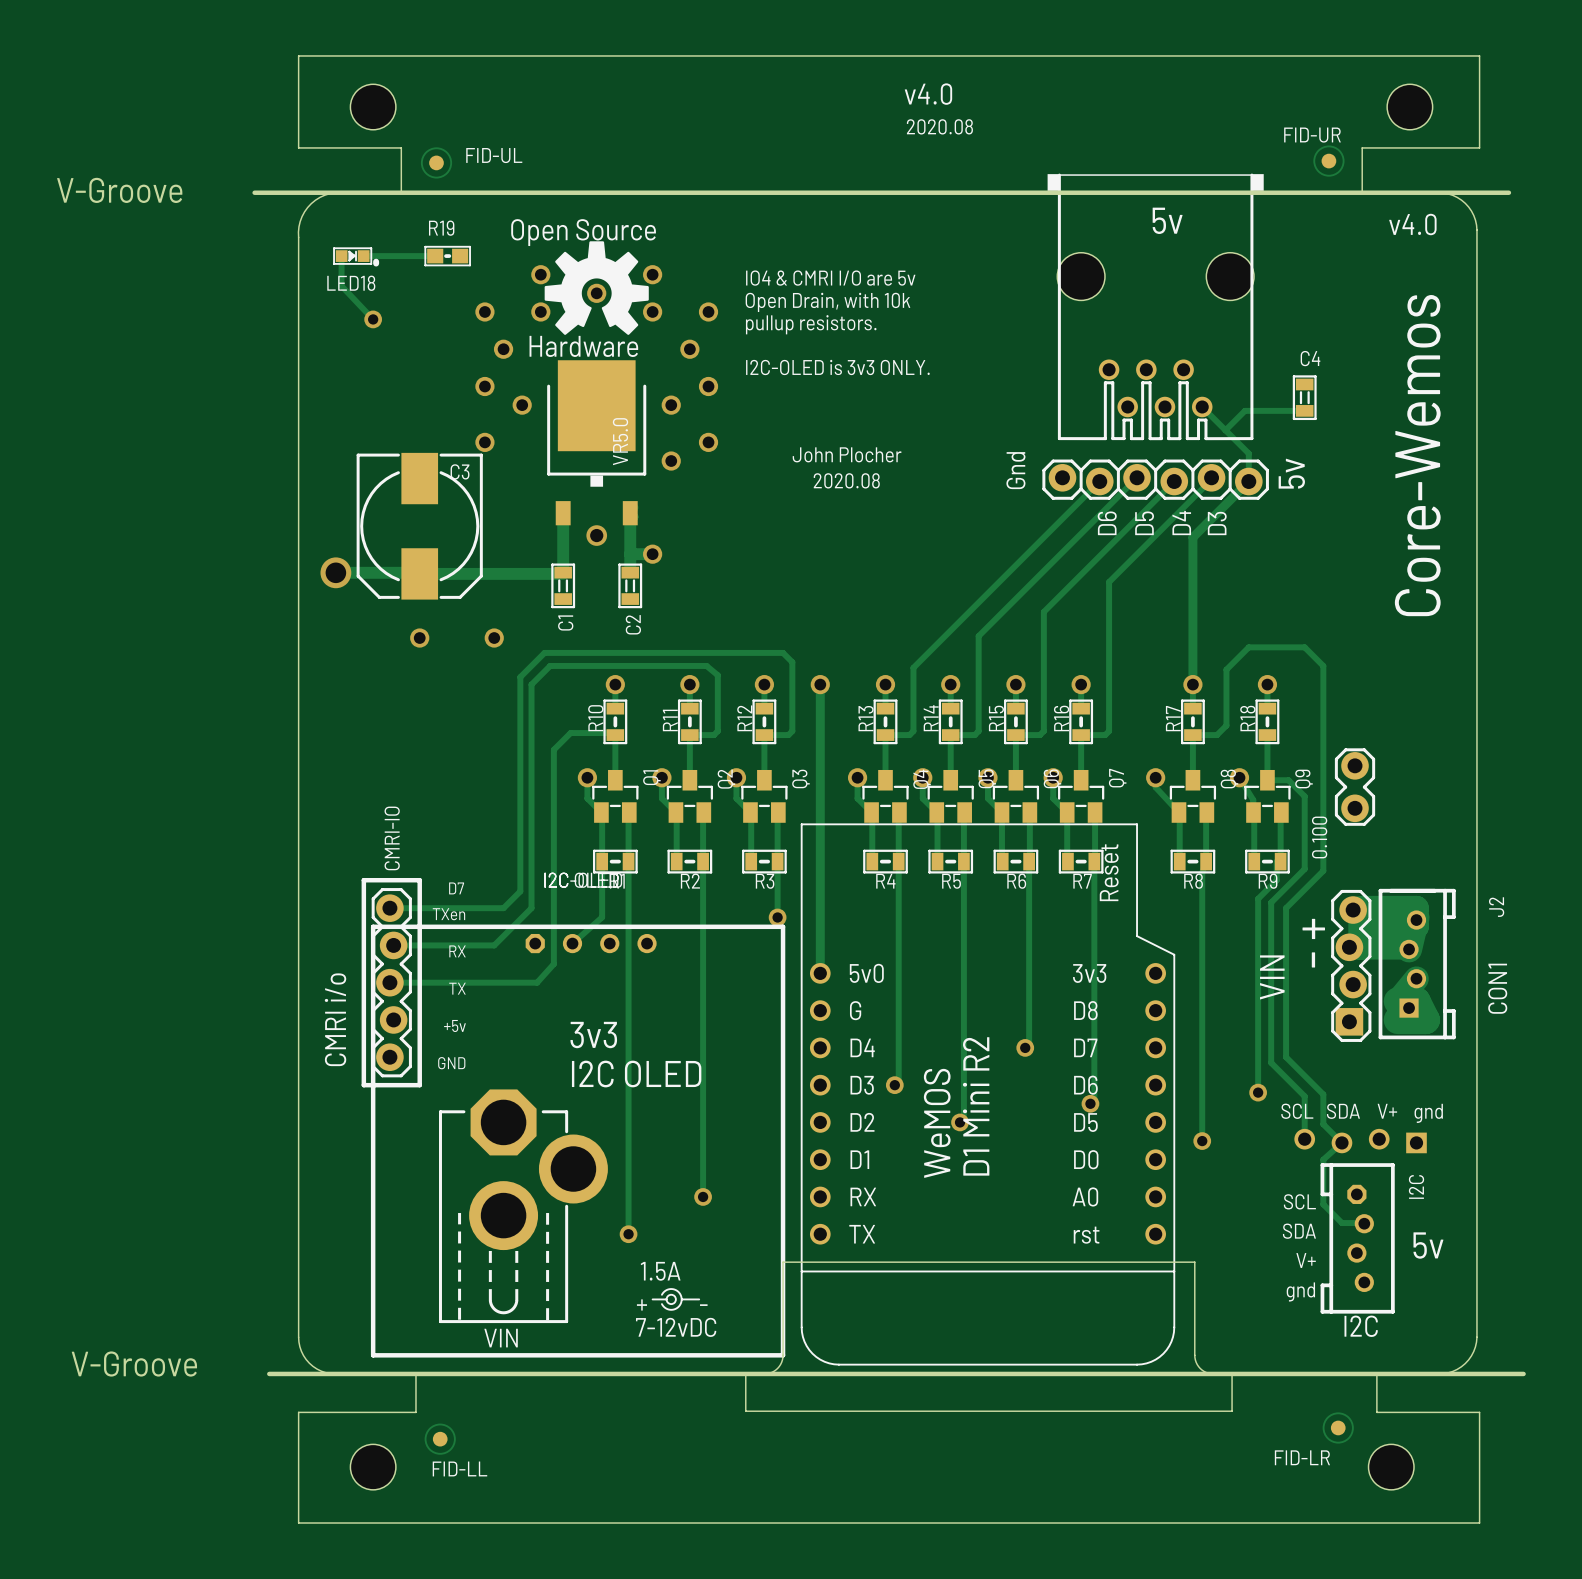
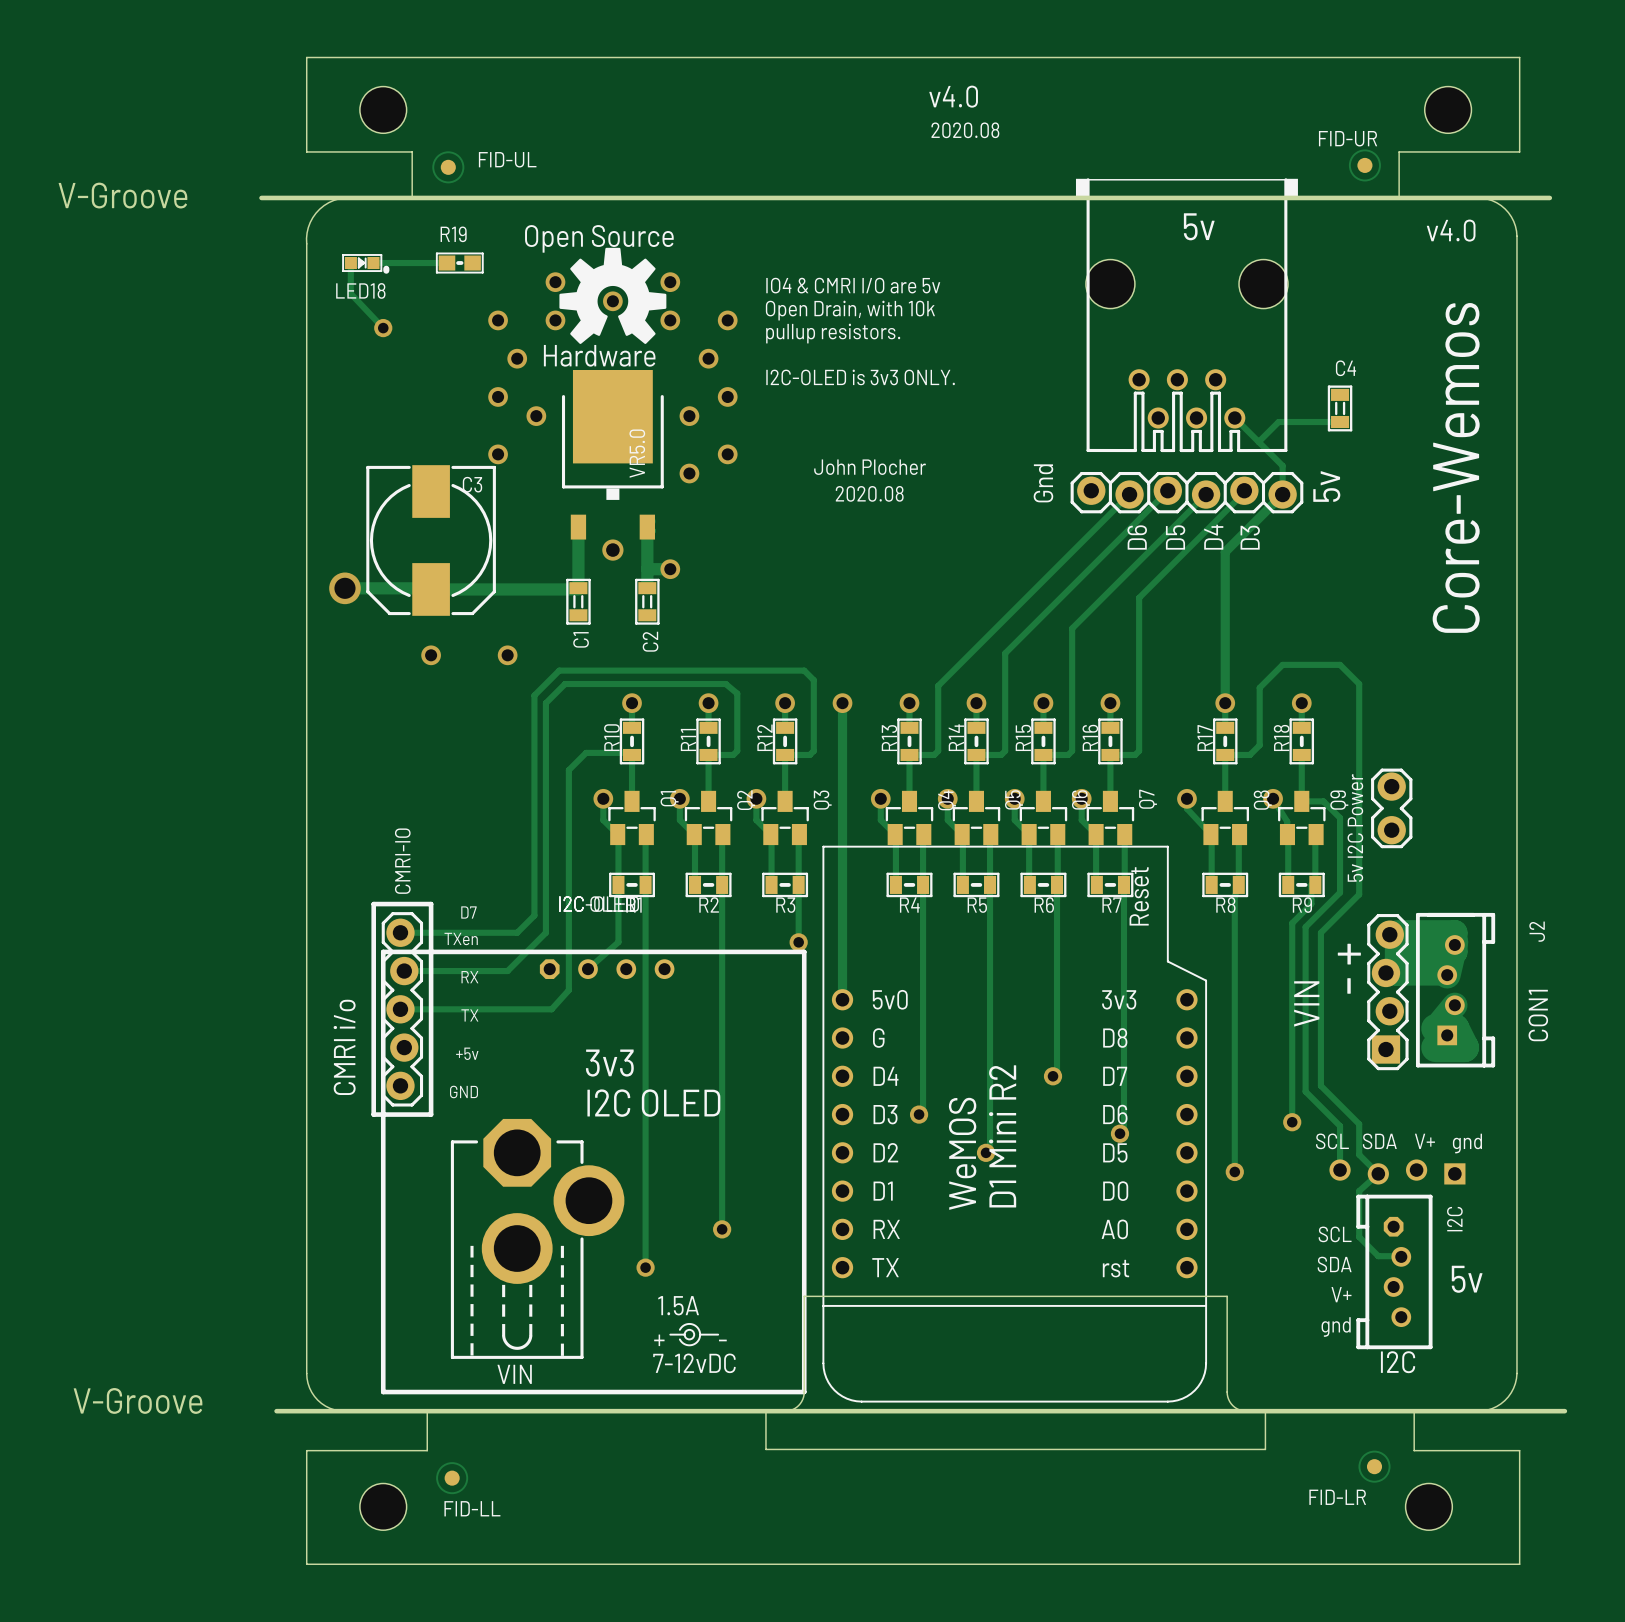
part value: 0.100 (1319, 837) -> 5v I2C Power (1355, 827)

